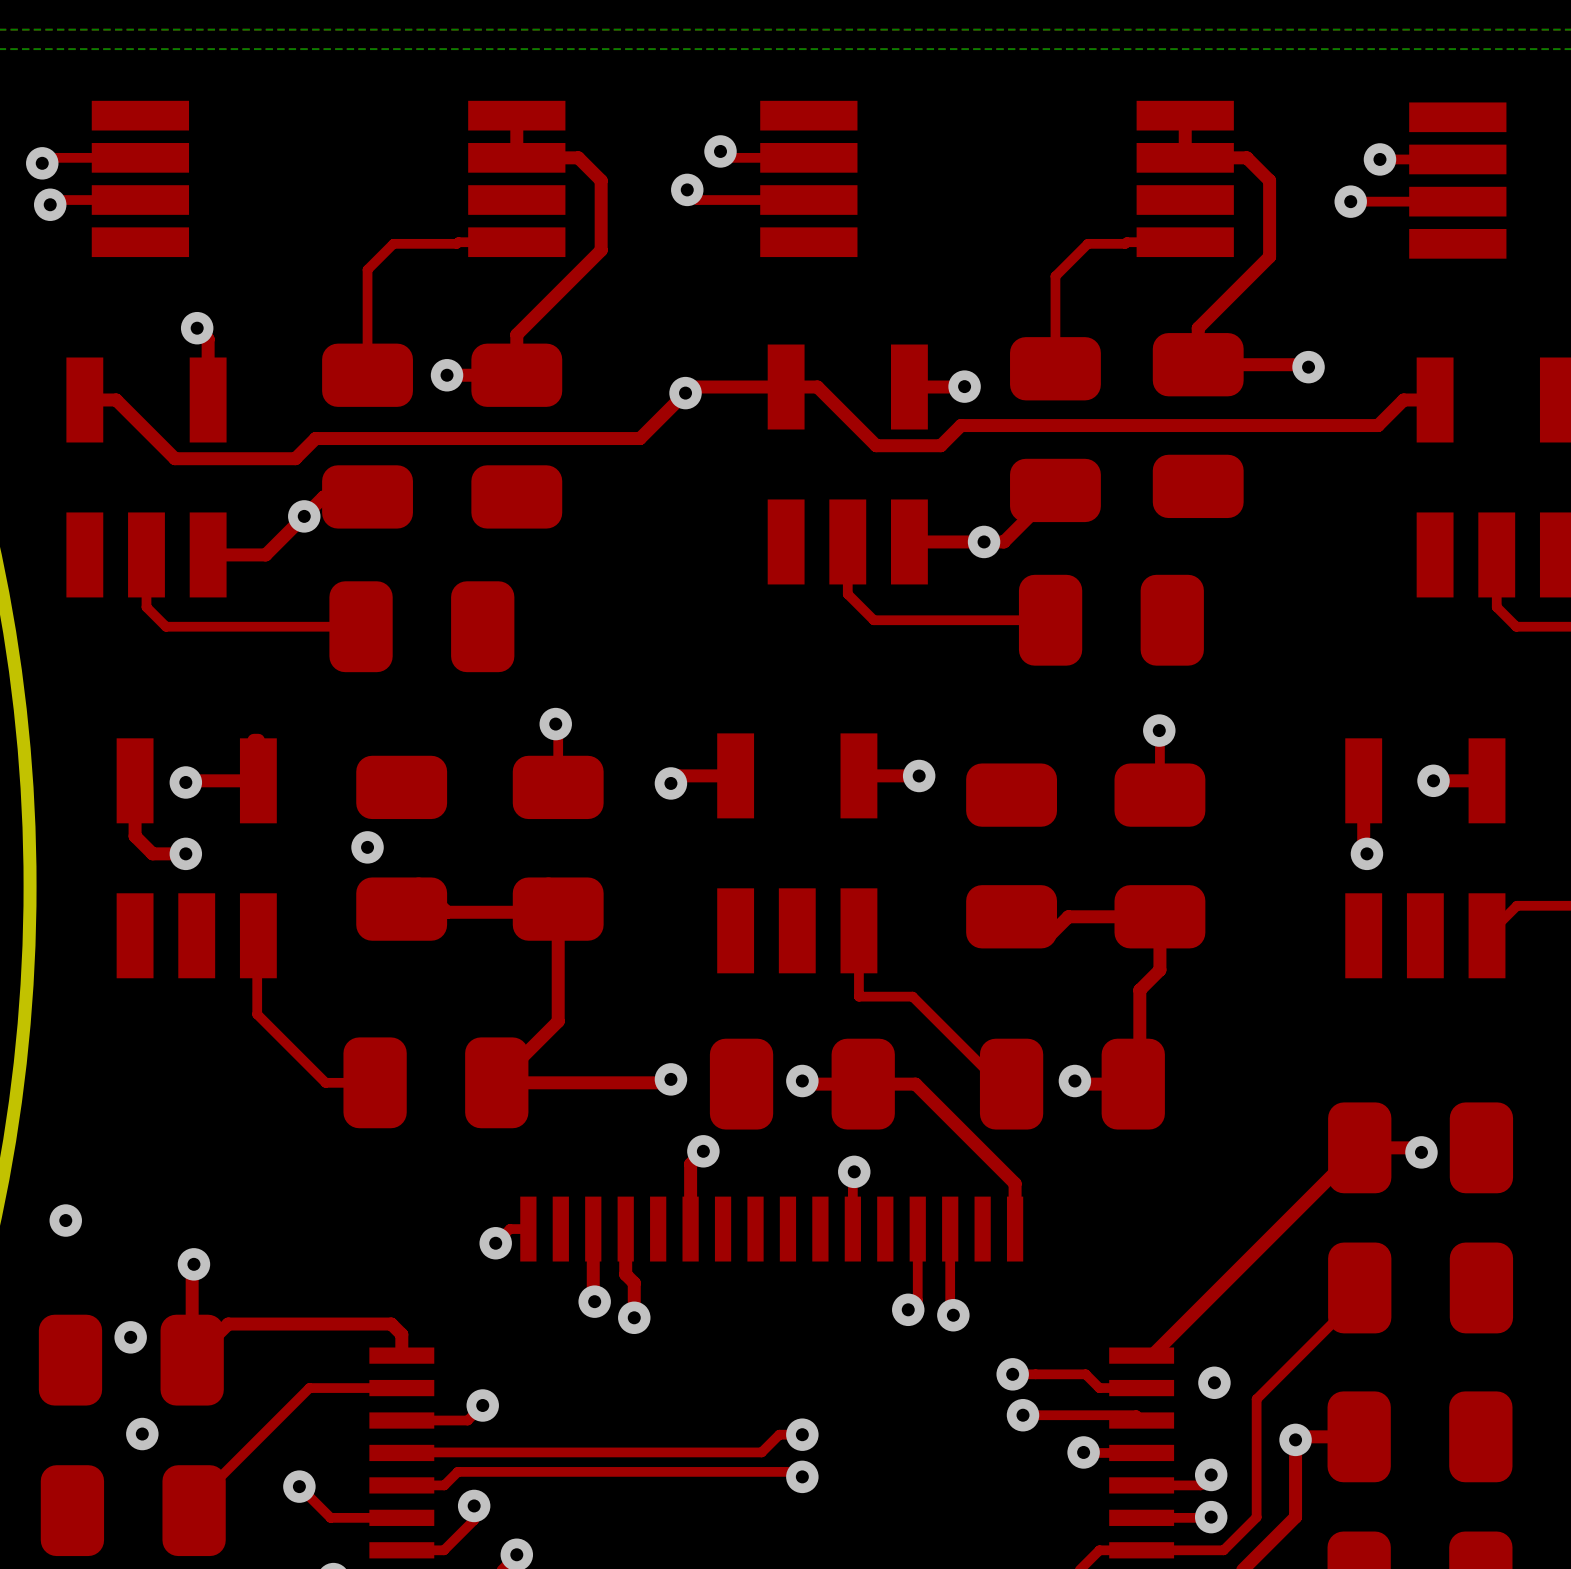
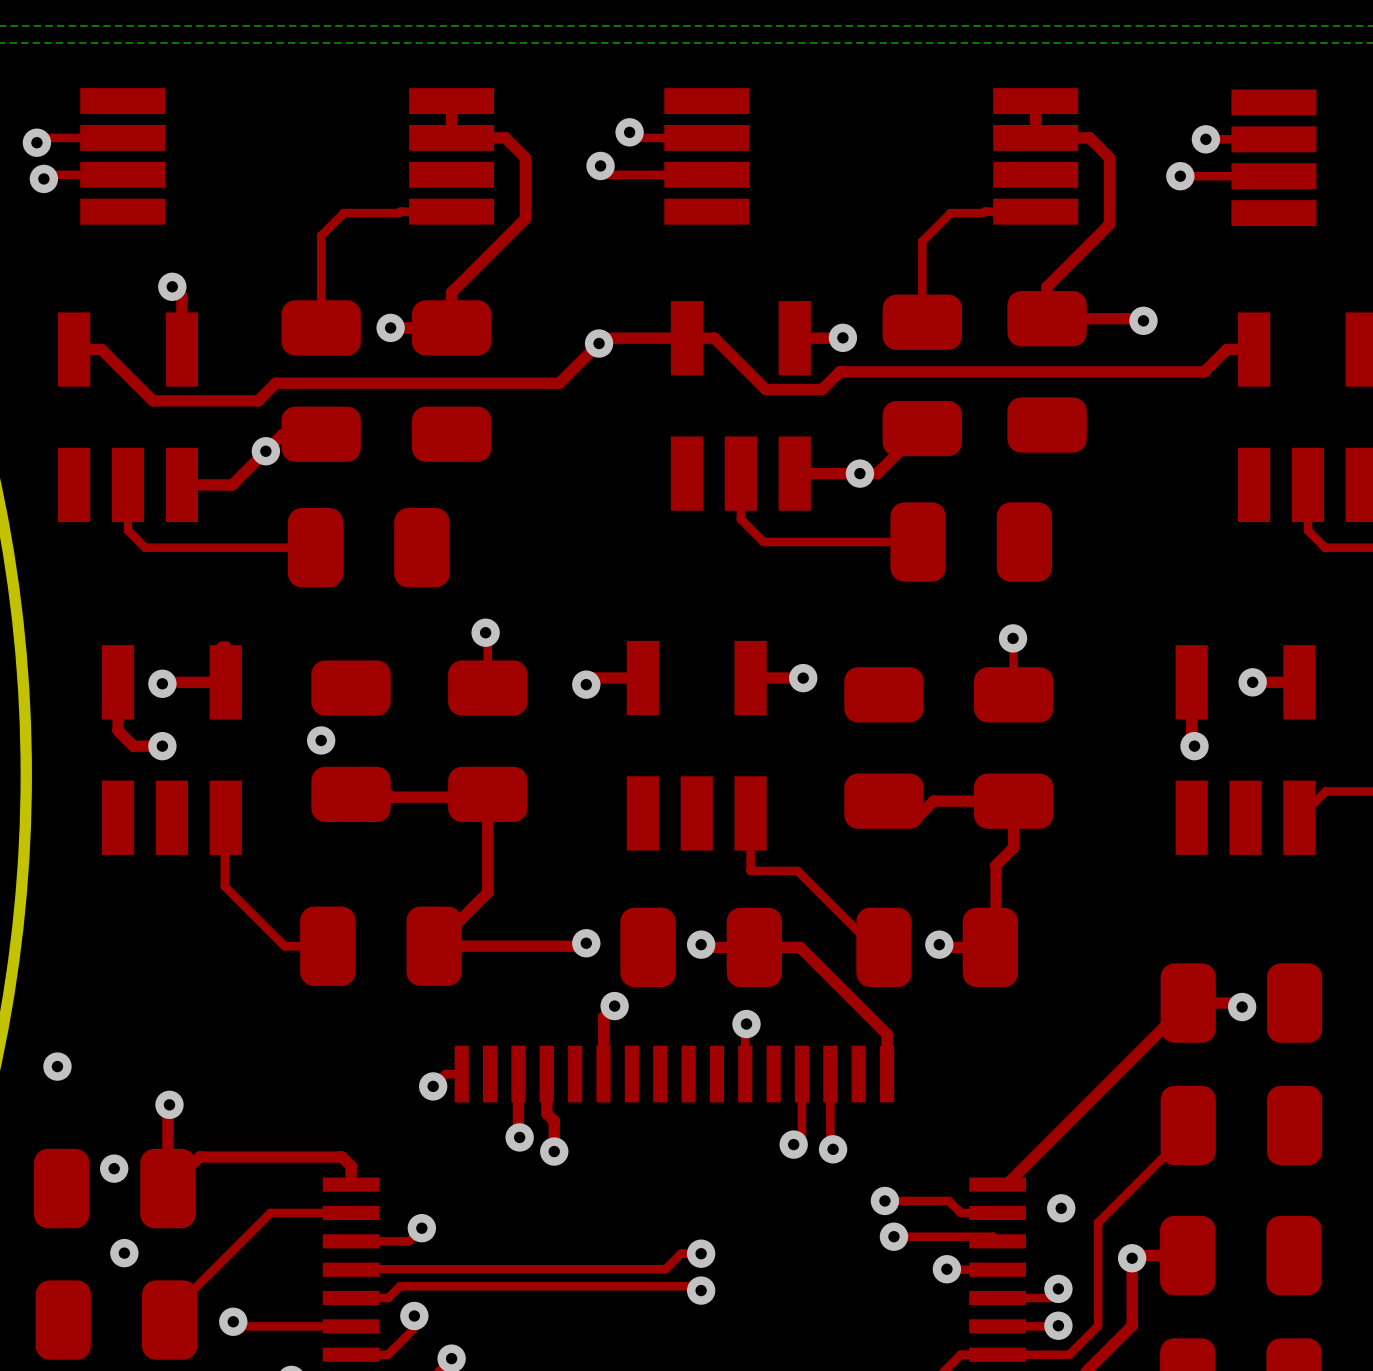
top track: (299, 1486) (330, 1517) -> (233, 1321) (237, 1326) (288, 1326)
via position: (299, 1486) -> (233, 1321)

